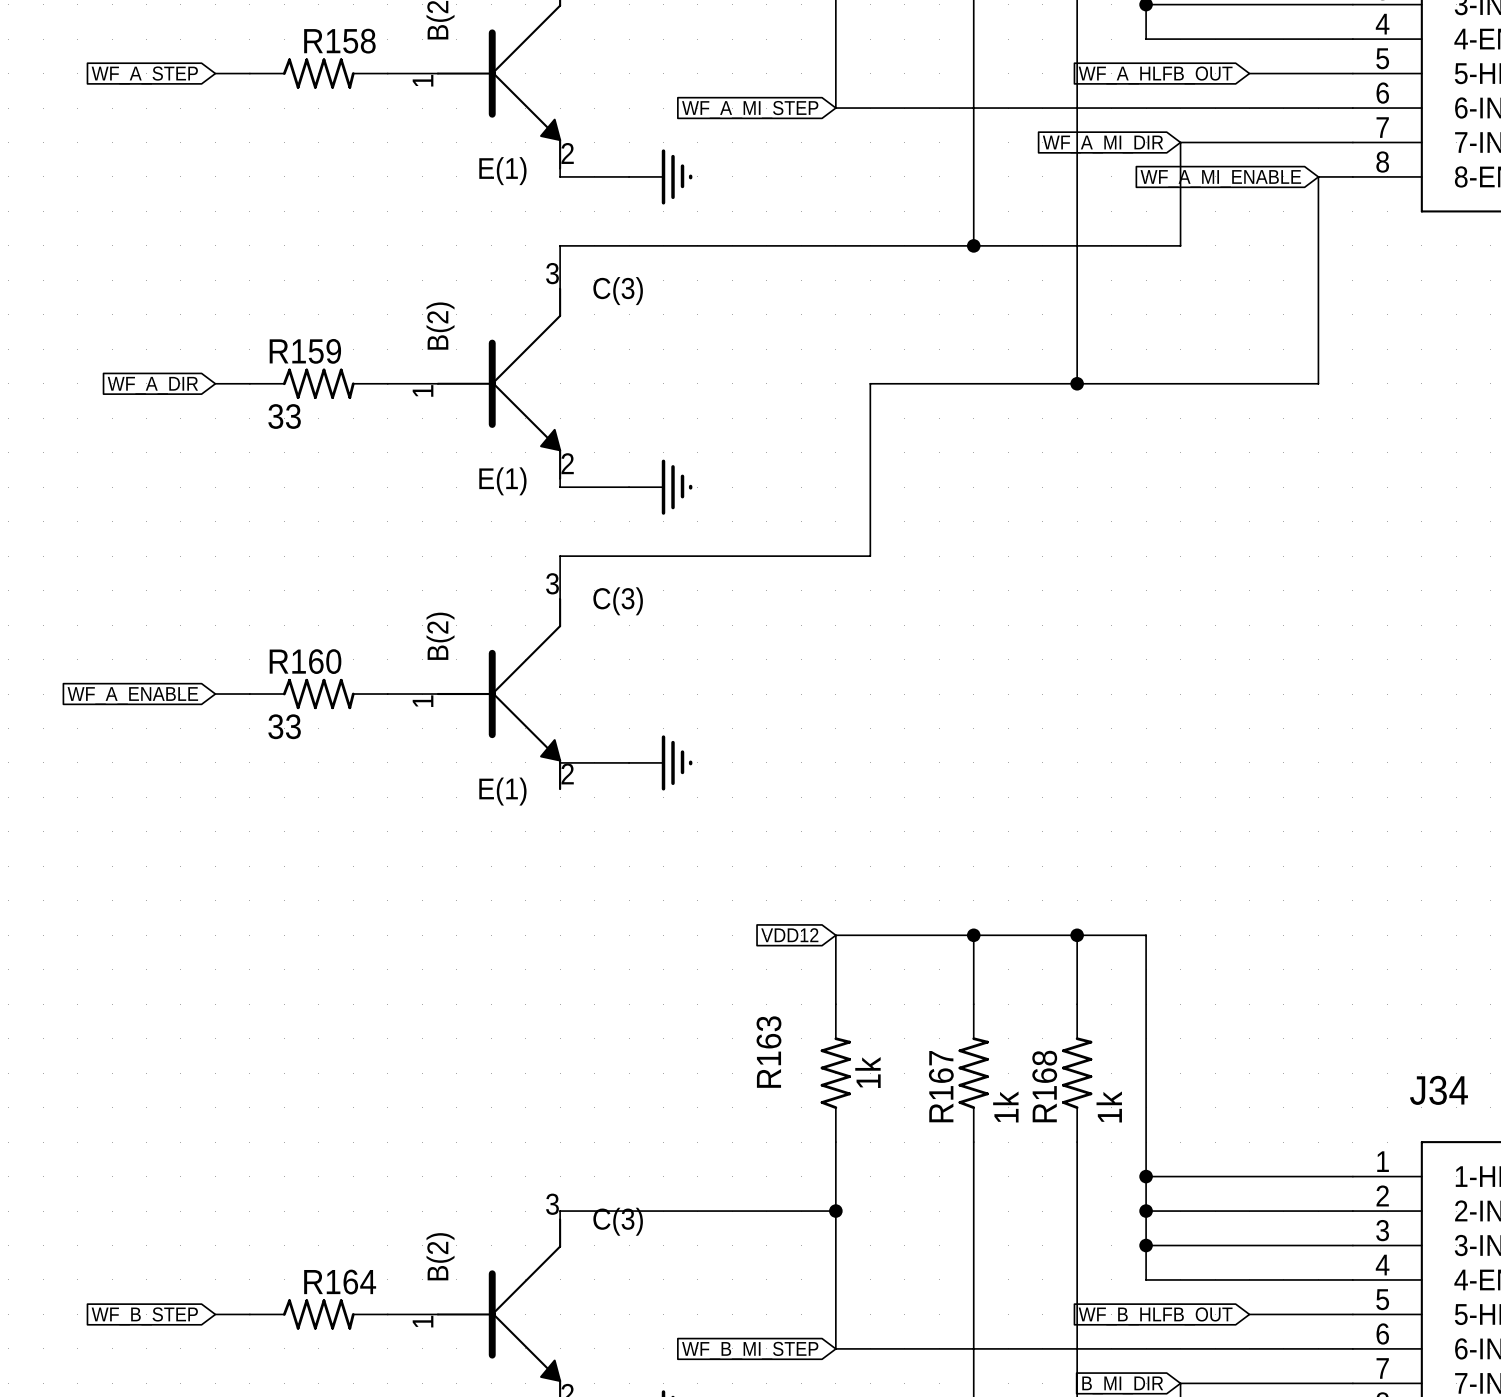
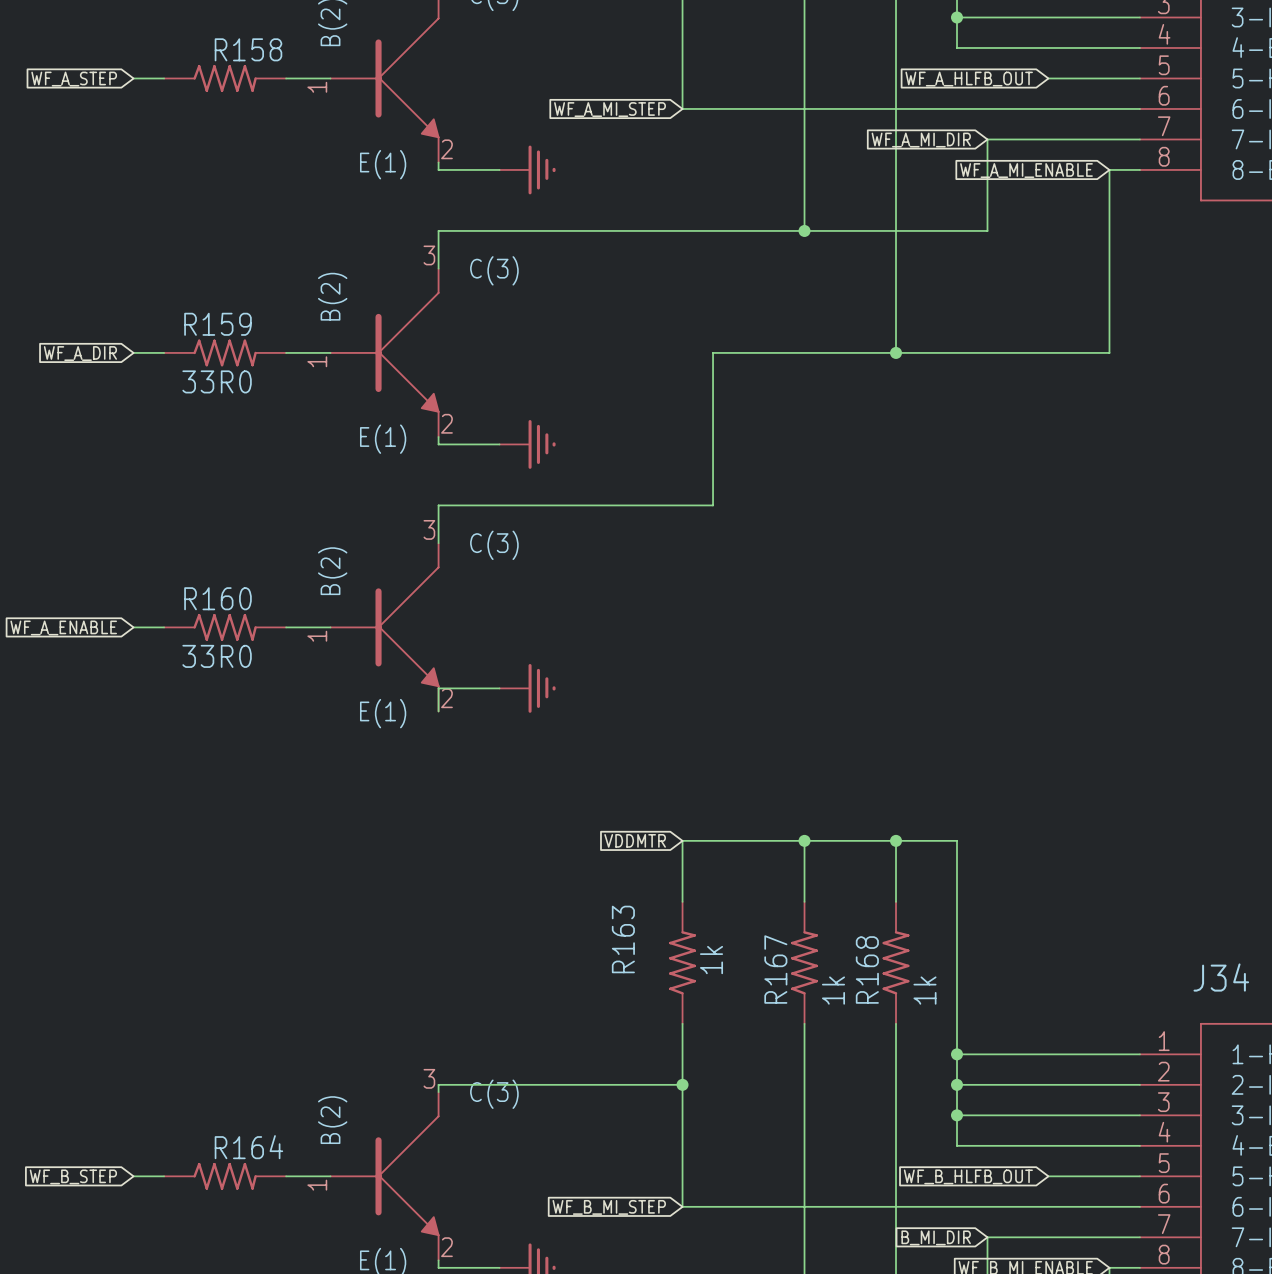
R159 value: 33 (284, 416) -> 33R0 (217, 381)
R160 value: 33 (284, 726) -> 33R0 (217, 656)
global label: VDD12 (789, 935) -> VDDMTR (635, 840)

